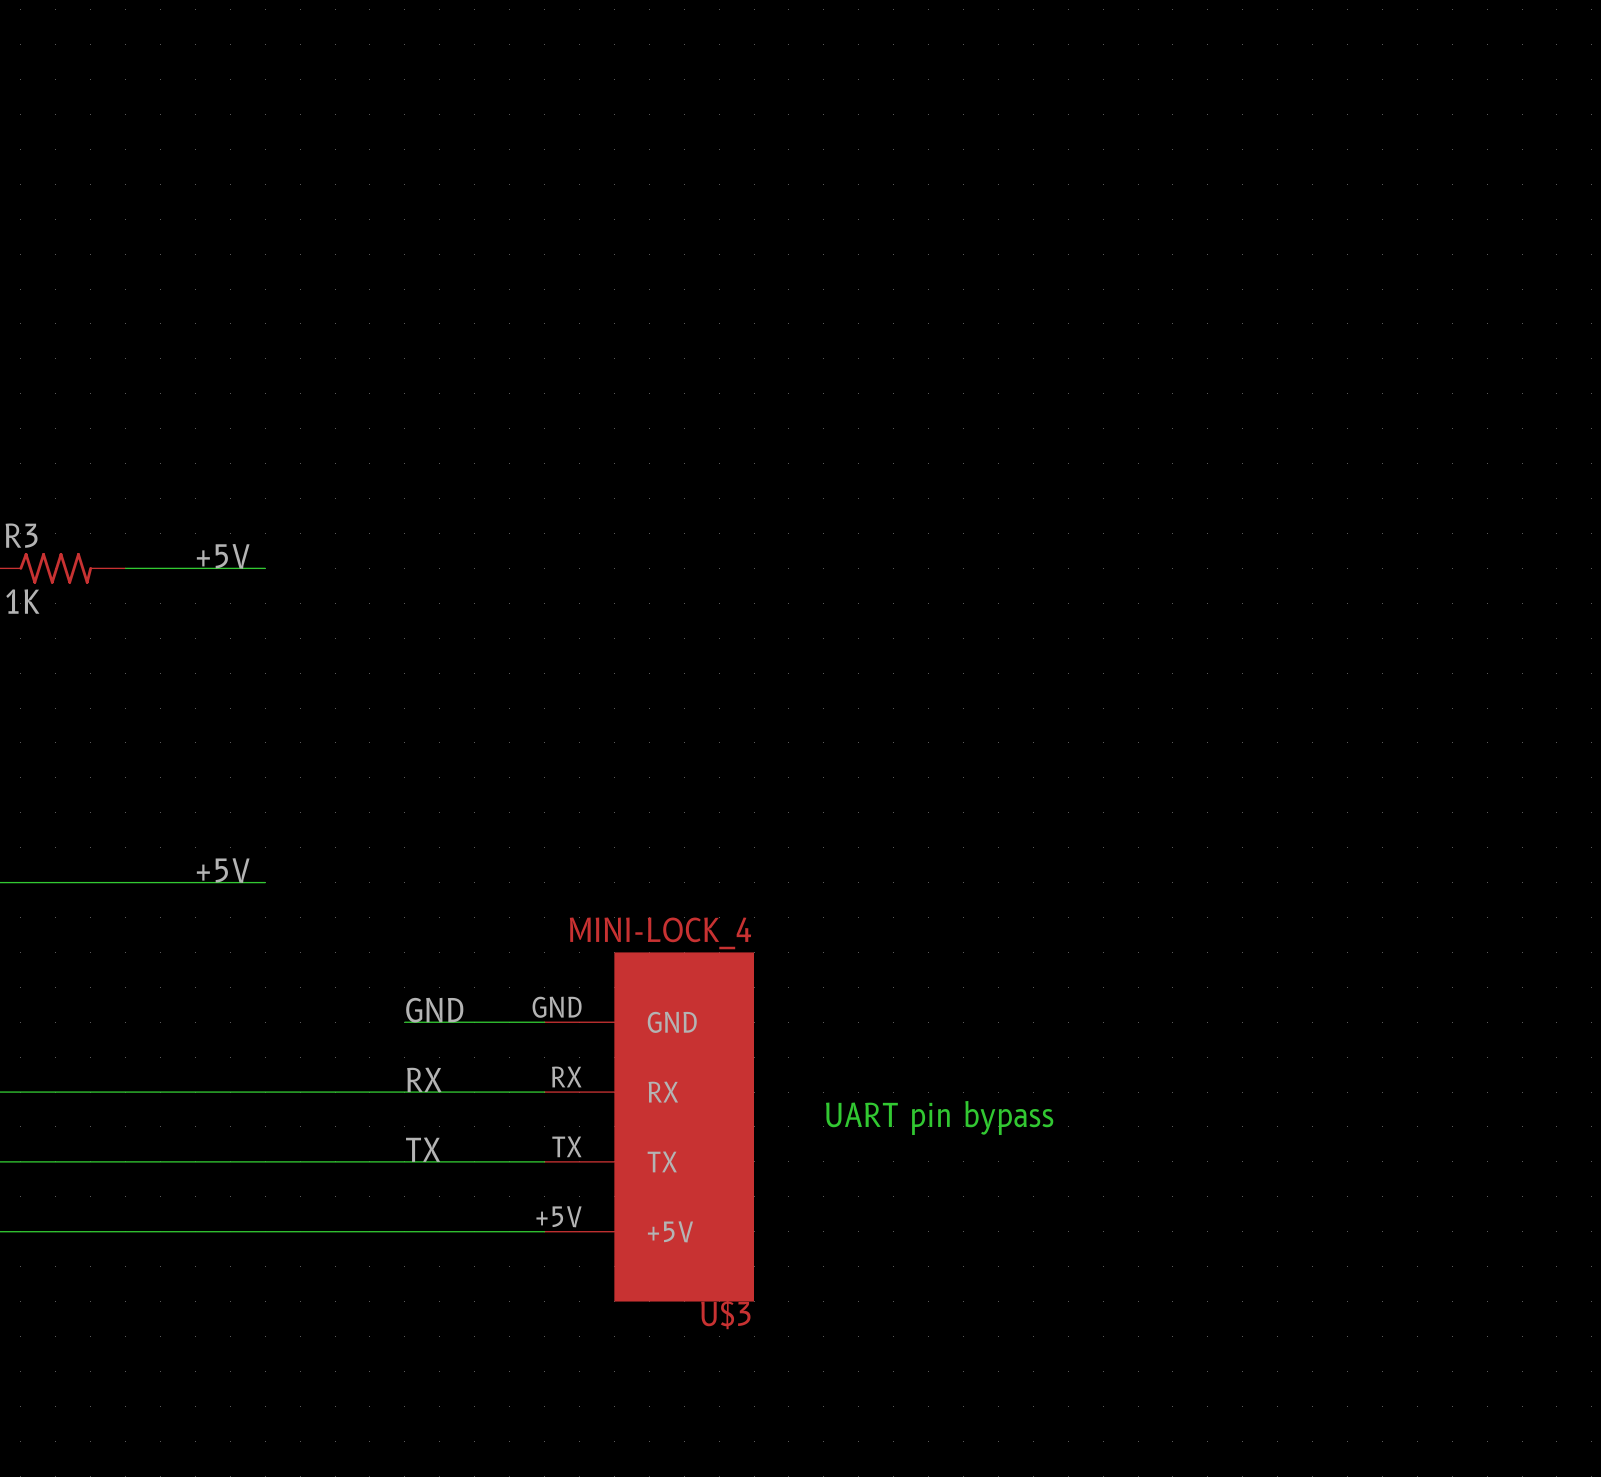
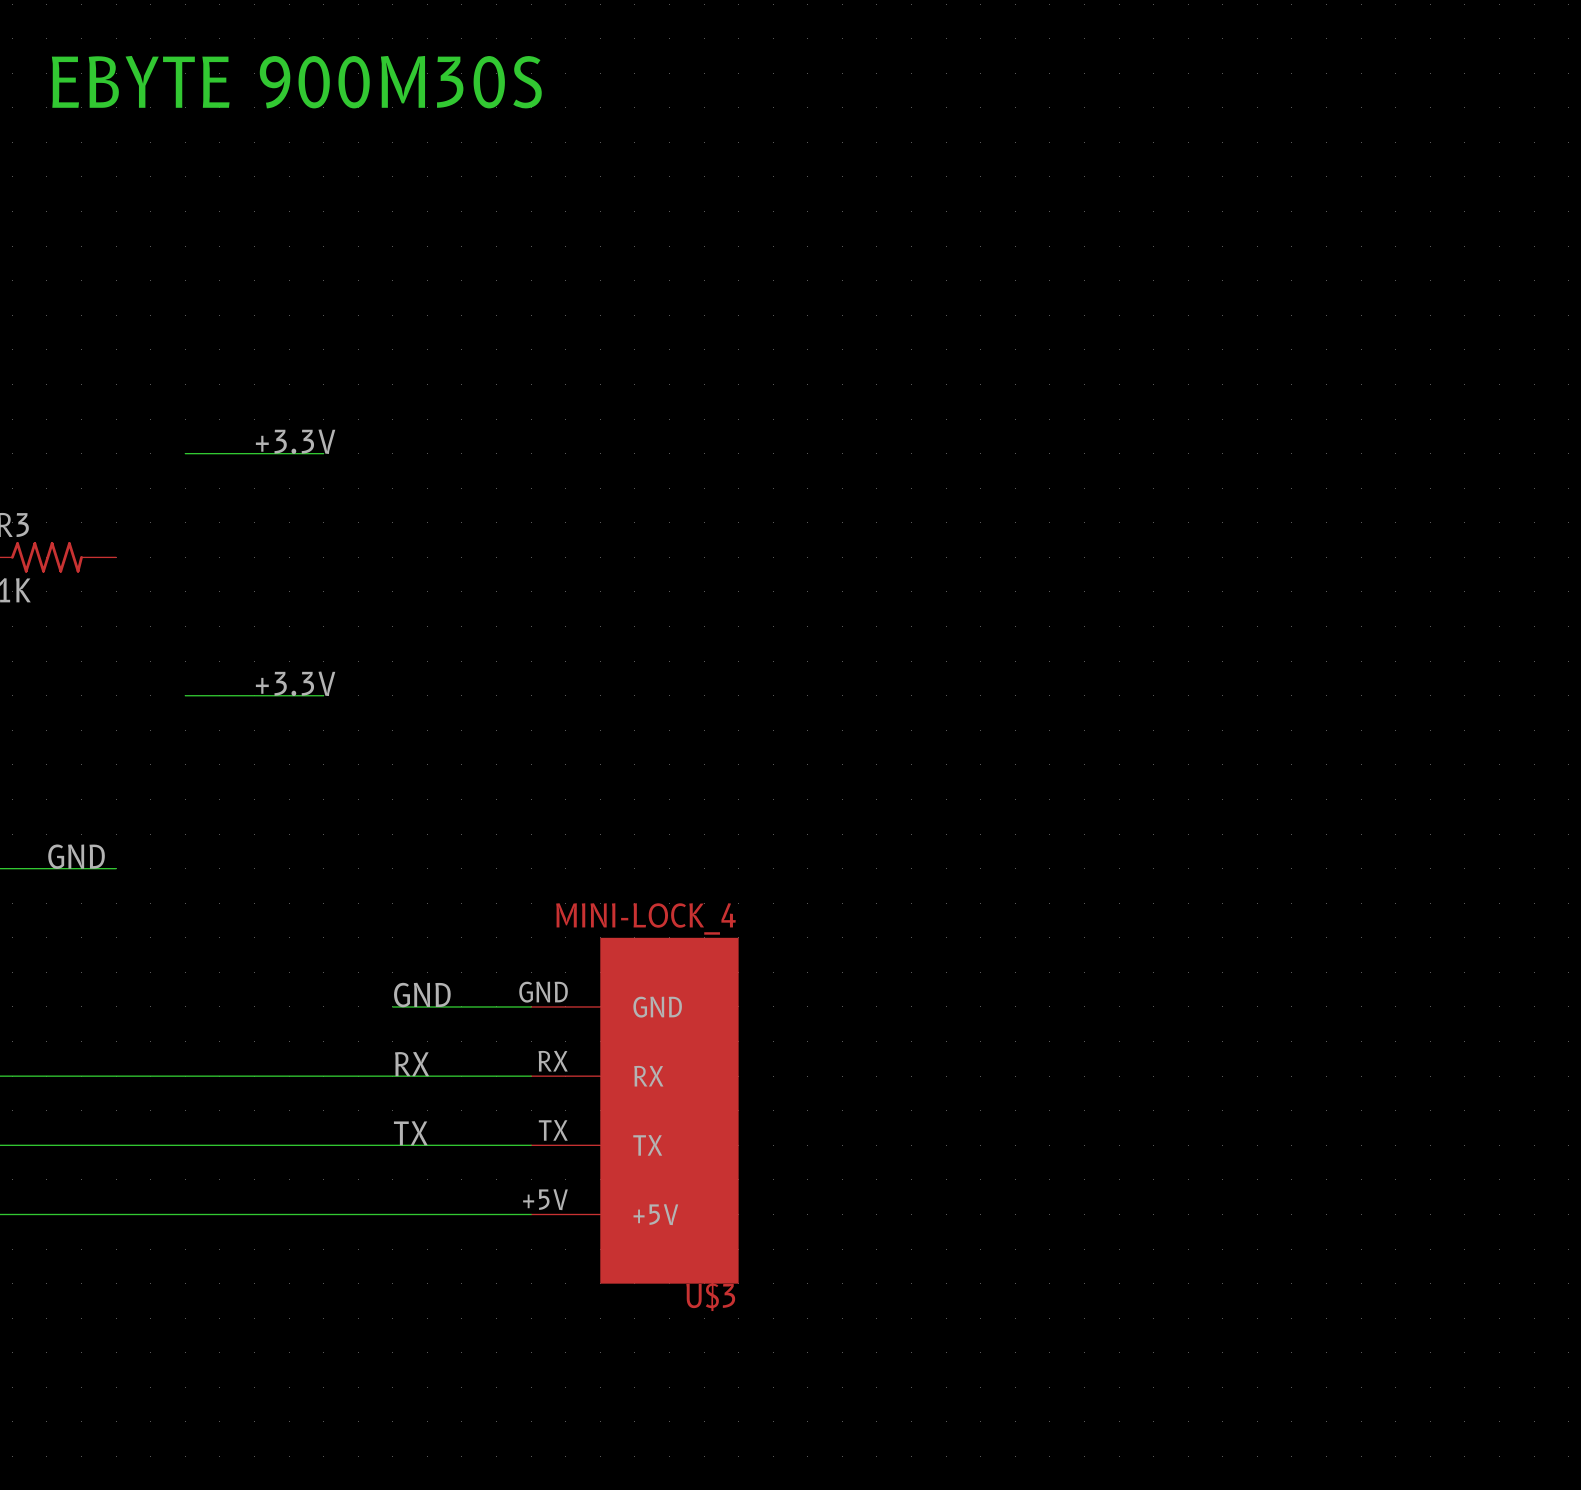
text: none -> EBYTE 900M30S (296, 82)
label: none -> +3.3V (295, 441)
label: +5V (223, 556) -> none
wire: (125, 568) (265, 568) -> (185, 453) (323, 453)
label: none -> +3.3V (295, 683)
label: none -> GND (76, 856)
label: +5V (223, 870) -> none
wire: (125, 882) (265, 882) -> (185, 695) (323, 695)
text: UART pin bypass (939, 1117) -> none

